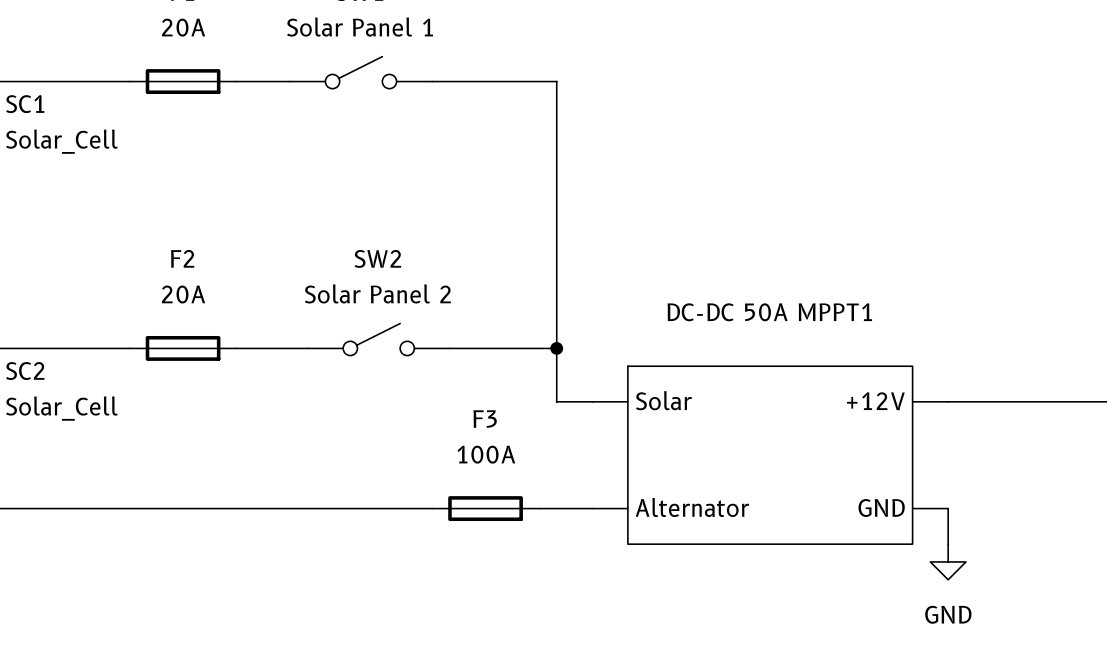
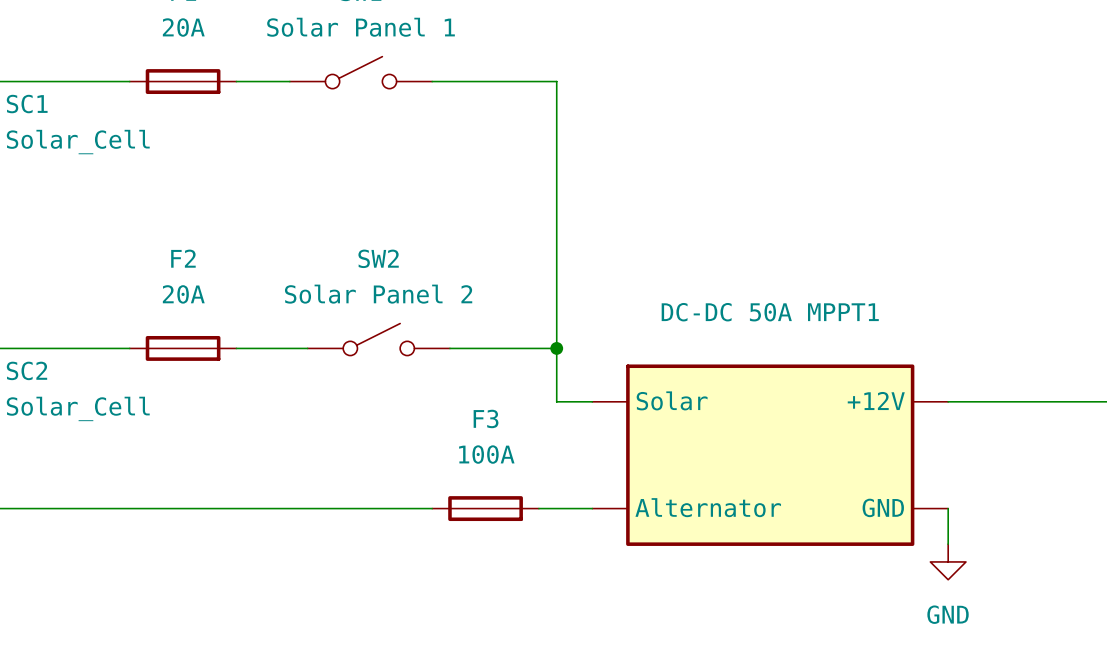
DC-DC 50A MPPT1 symbol: [592, 366, 949, 545] -> [592, 364, 949, 546]

